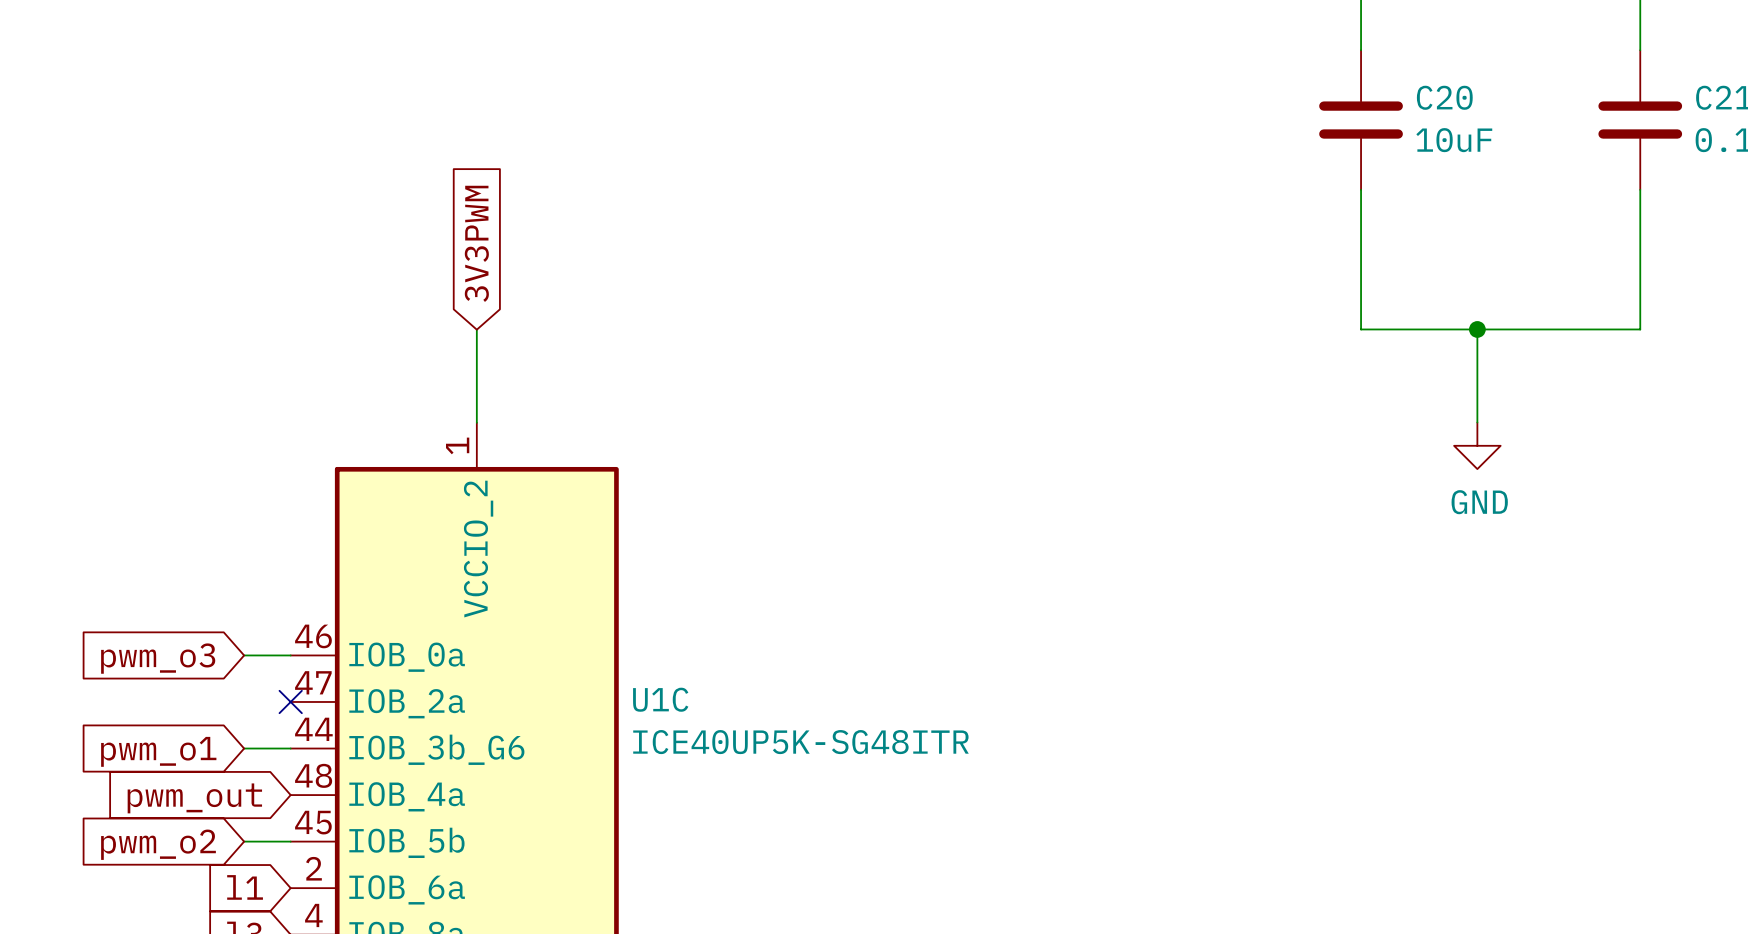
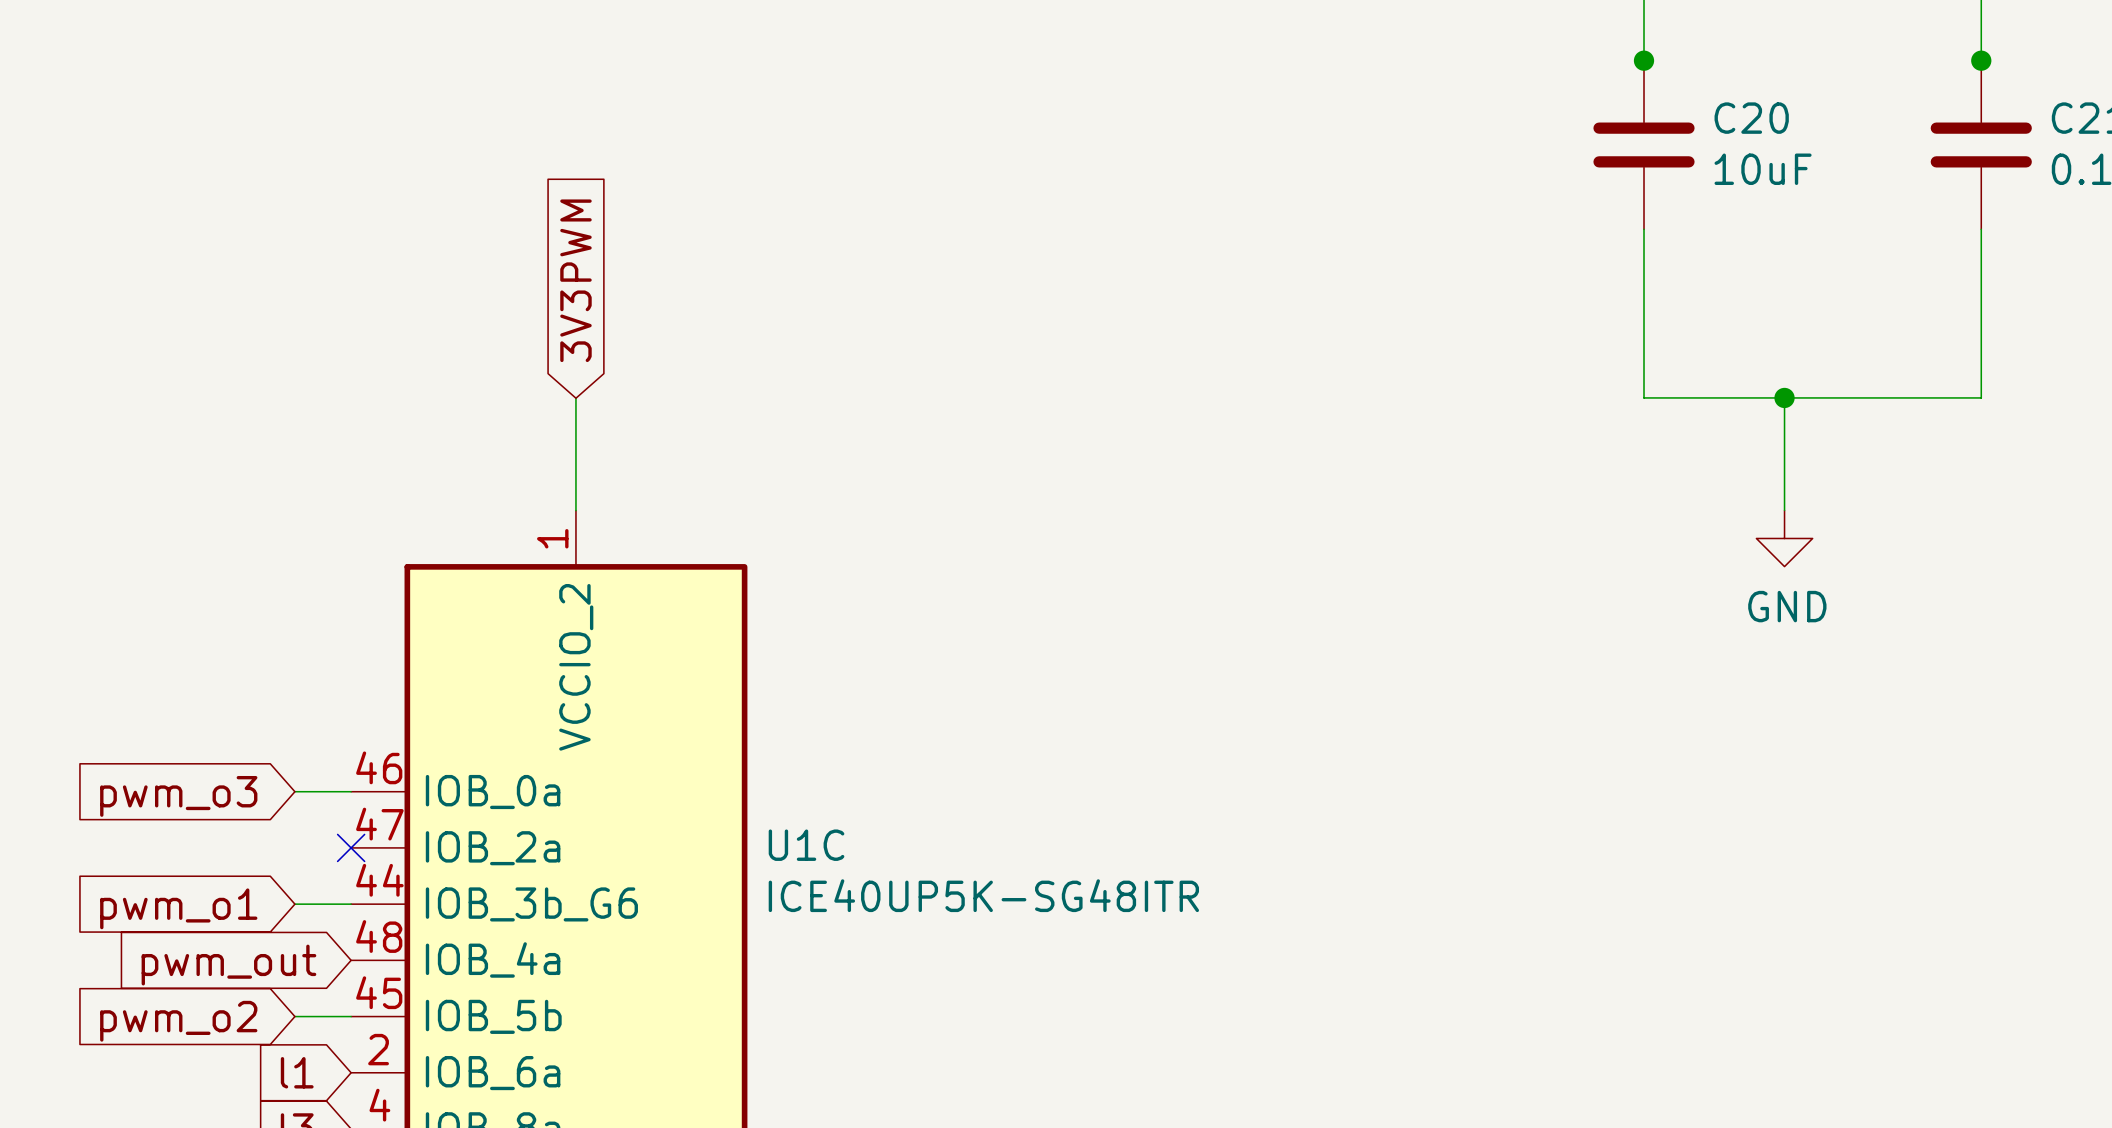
junction: none -> (1644, 60)
junction: none -> (1981, 60)

